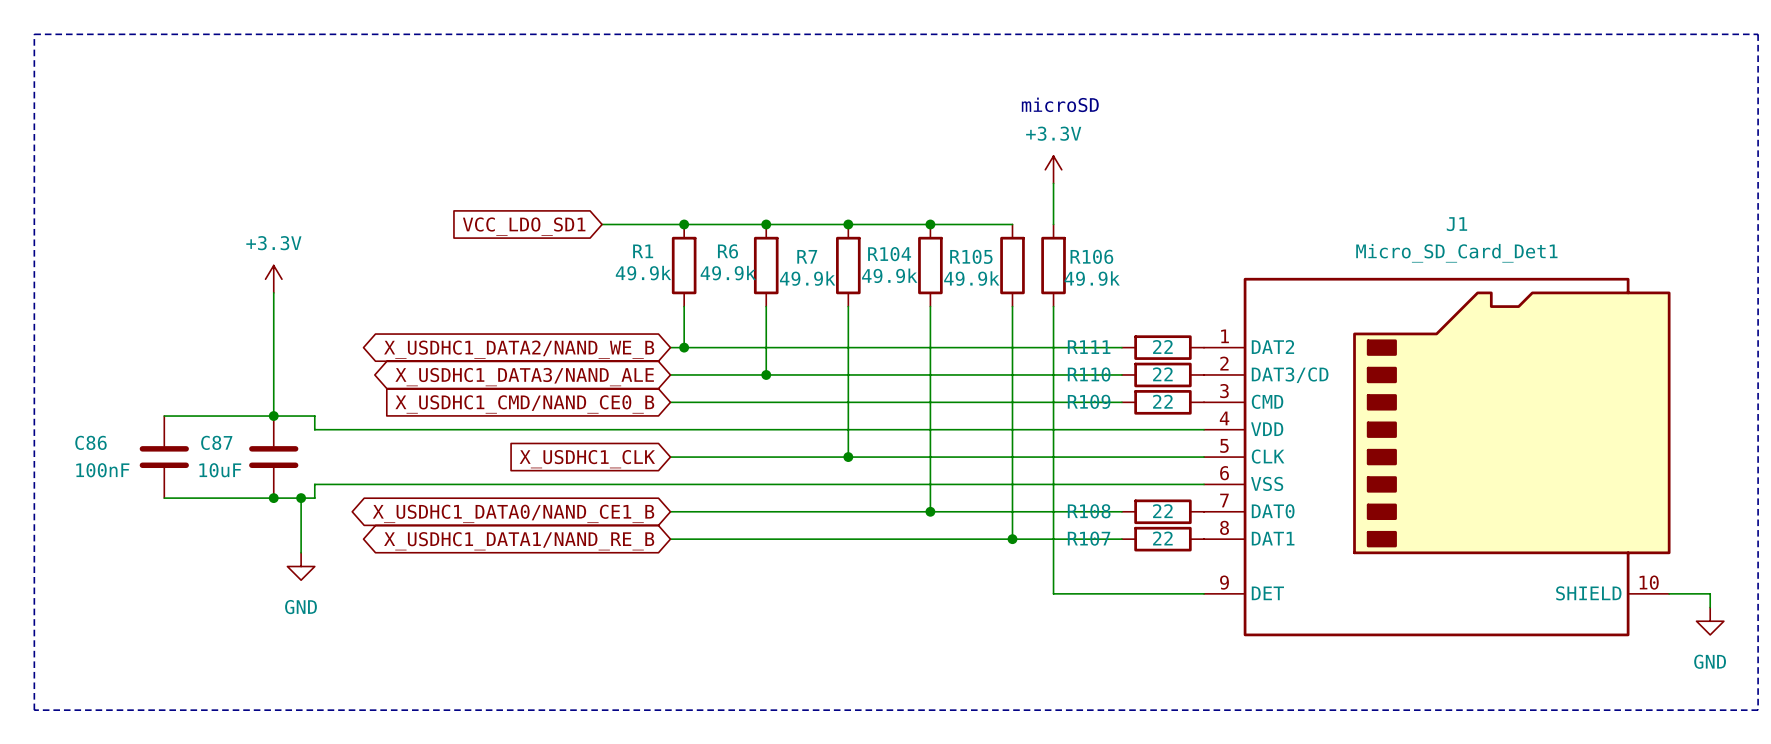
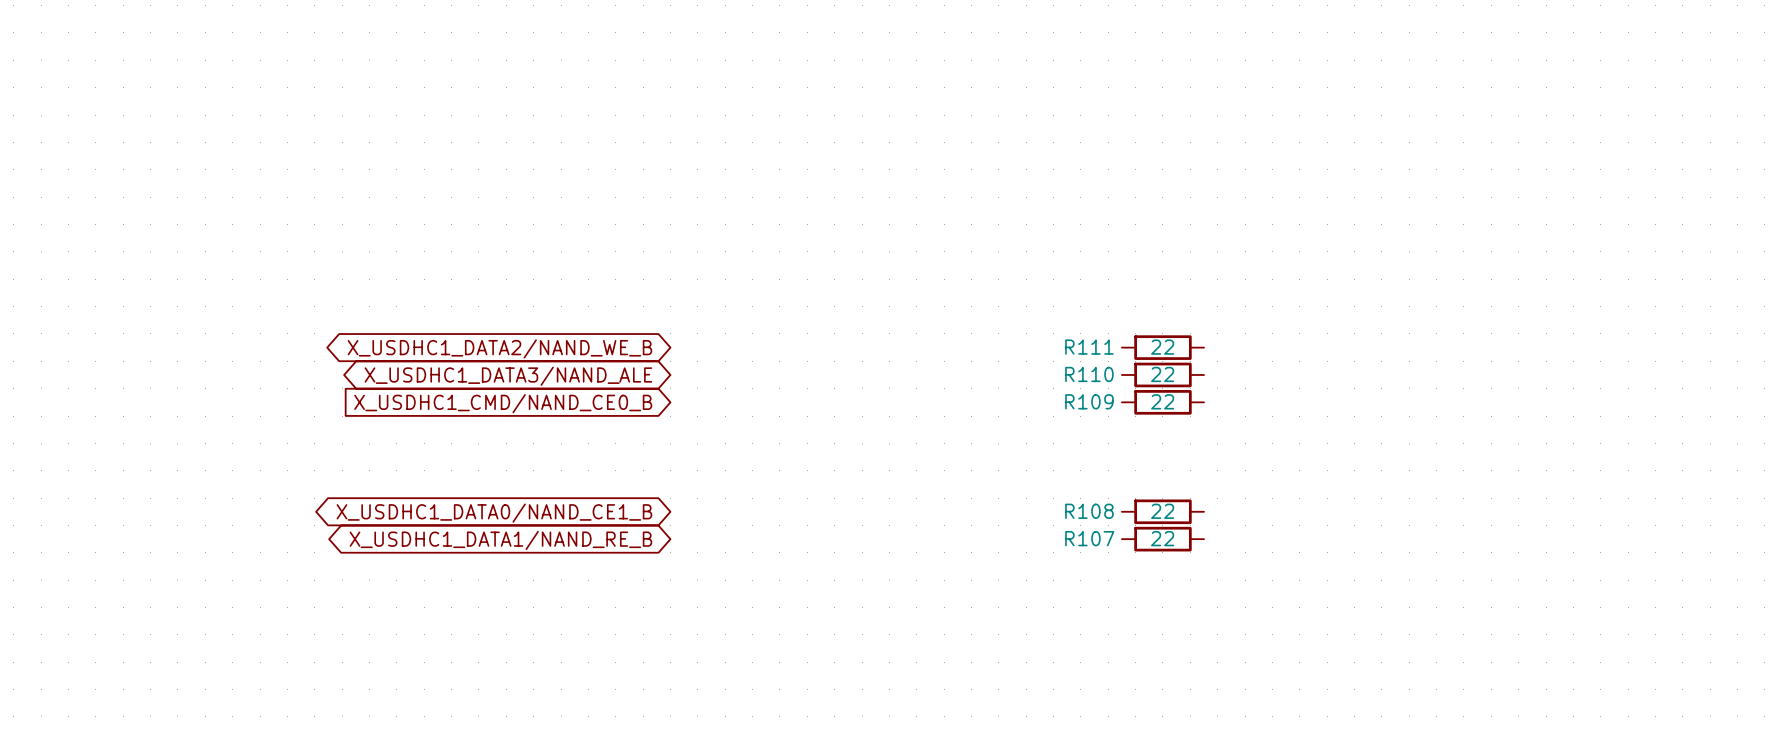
line: (34, 34) (1758, 34) (1758, 710) (34, 710) (34, 34) -> none
text: microSD (1060, 104) -> none
power symbol: +3.3V (1053, 169) -> none
wire: (1053, 183) (1053, 224) -> none
wire: (602, 224) (1012, 224) -> none
junction: (684, 224) -> none
junction: (766, 224) -> none
junction: (848, 224) -> none
junction: (930, 224) -> none
global label: VCC_LDO_SD1 (524, 226) -> none
R1: 49.9k (684, 265) -> none
R6: 49.9k (766, 265) -> none
R7: 49.9k (848, 265) -> none
R104: 49.9k (930, 265) -> none
R105: 49.9k (1012, 265) -> none
R106: 49.9k (1053, 265) -> none
power symbol: +3.3V (273, 279) -> none
wire: (273, 292) (273, 416) -> none
wire: (684, 306) (684, 347) -> none
wire: (766, 306) (766, 374) -> none
wire: (848, 306) (848, 457) -> none
wire: (930, 306) (930, 511) -> none
wire: (1012, 306) (1012, 539) -> none
wire: (1053, 306) (1053, 593) (1204, 593) -> none
wire: (670, 347) (1121, 347) -> none
junction: (684, 347) -> none
wire: (670, 374) (1121, 374) -> none
junction: (766, 374) -> none
wire: (670, 402) (1121, 402) -> none
wire: (164, 416) (314, 416) (314, 429) (1204, 429) -> none
junction: (273, 416) -> none
C86: 100nF (164, 457) -> none
C87: 10uF (273, 457) -> none
wire: (670, 457) (1204, 457) -> none
junction: (848, 457) -> none
J1: Micro_SD_Card_Det1 (1437, 457) -> none
global label: X_USDHC1_CLK (587, 459) -> none
wire: (1204, 484) (314, 484) (314, 498) (164, 498) -> none
junction: (273, 498) -> none
wire: (301, 498) (301, 552) -> none
junction: (301, 498) -> none
wire: (670, 511) (1121, 511) -> none
junction: (930, 511) -> none
wire: (670, 539) (1121, 539) -> none
junction: (1012, 539) -> none
power symbol: GND (301, 566) -> none
wire: (1669, 593) (1710, 593) (1710, 607) -> none
power symbol: GND (1710, 621) -> none

